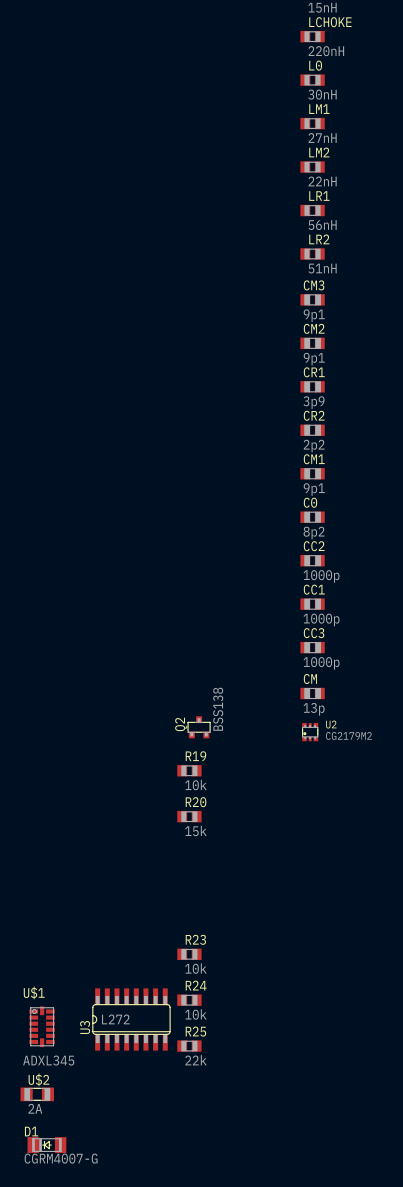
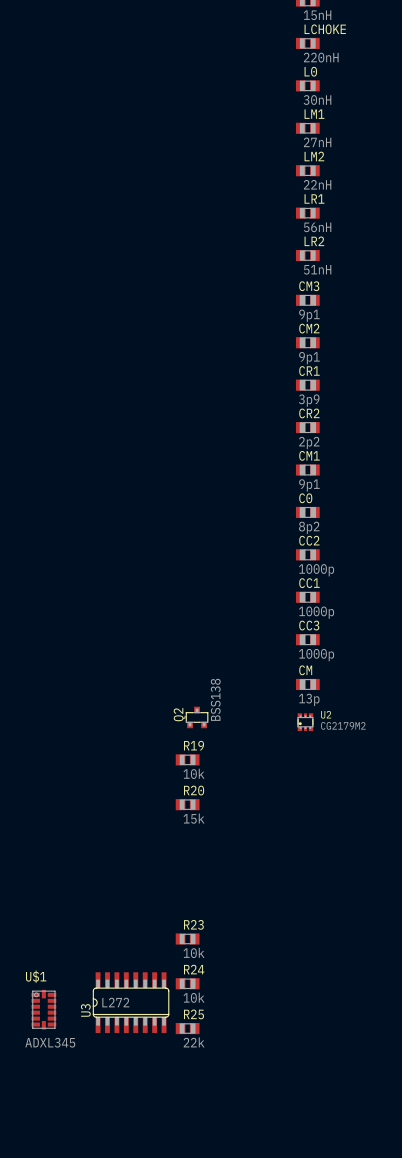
U$2: 2A (37, 1094) -> none
D1: CGRM4007-G (46, 1145) -> none

